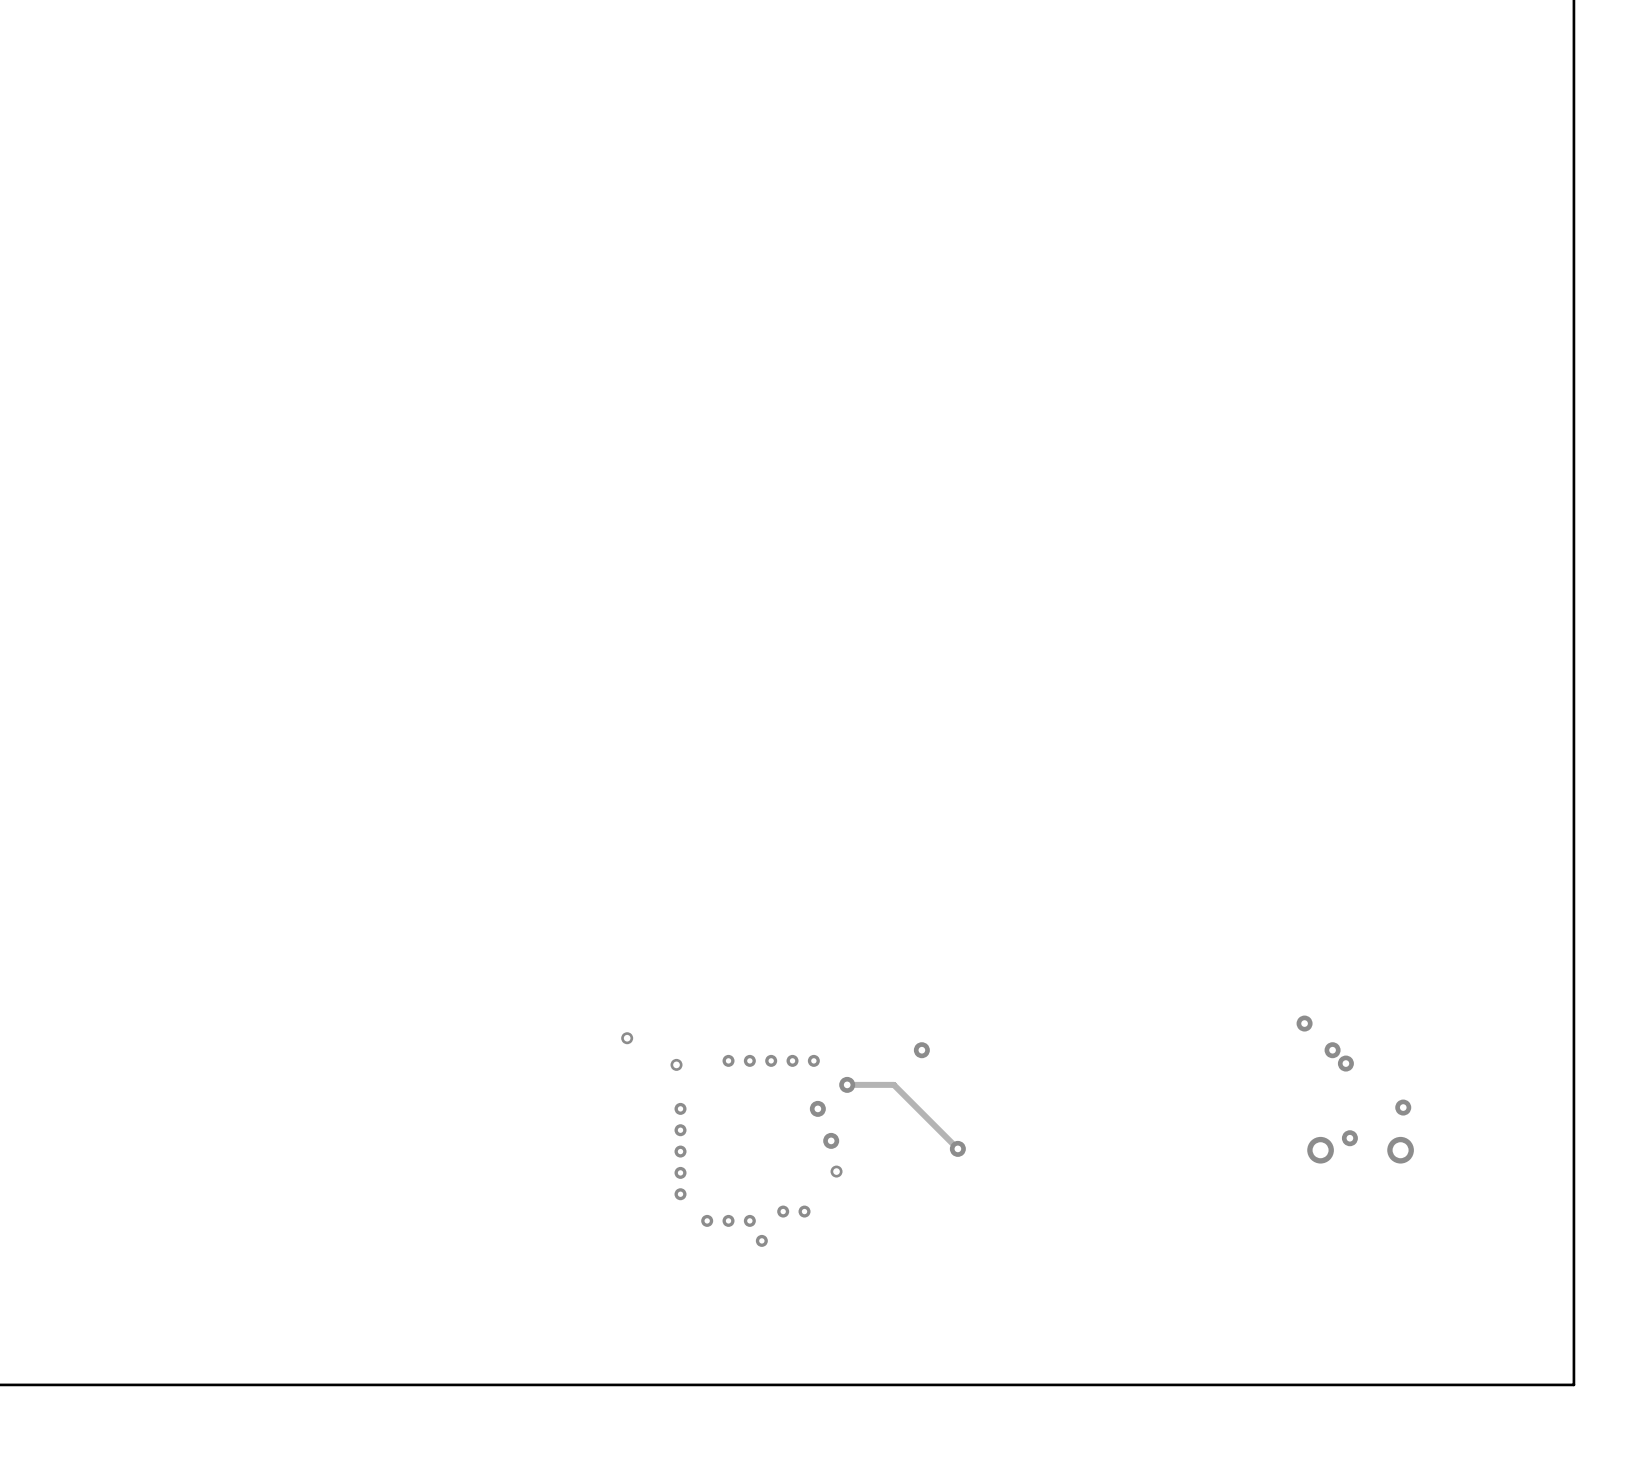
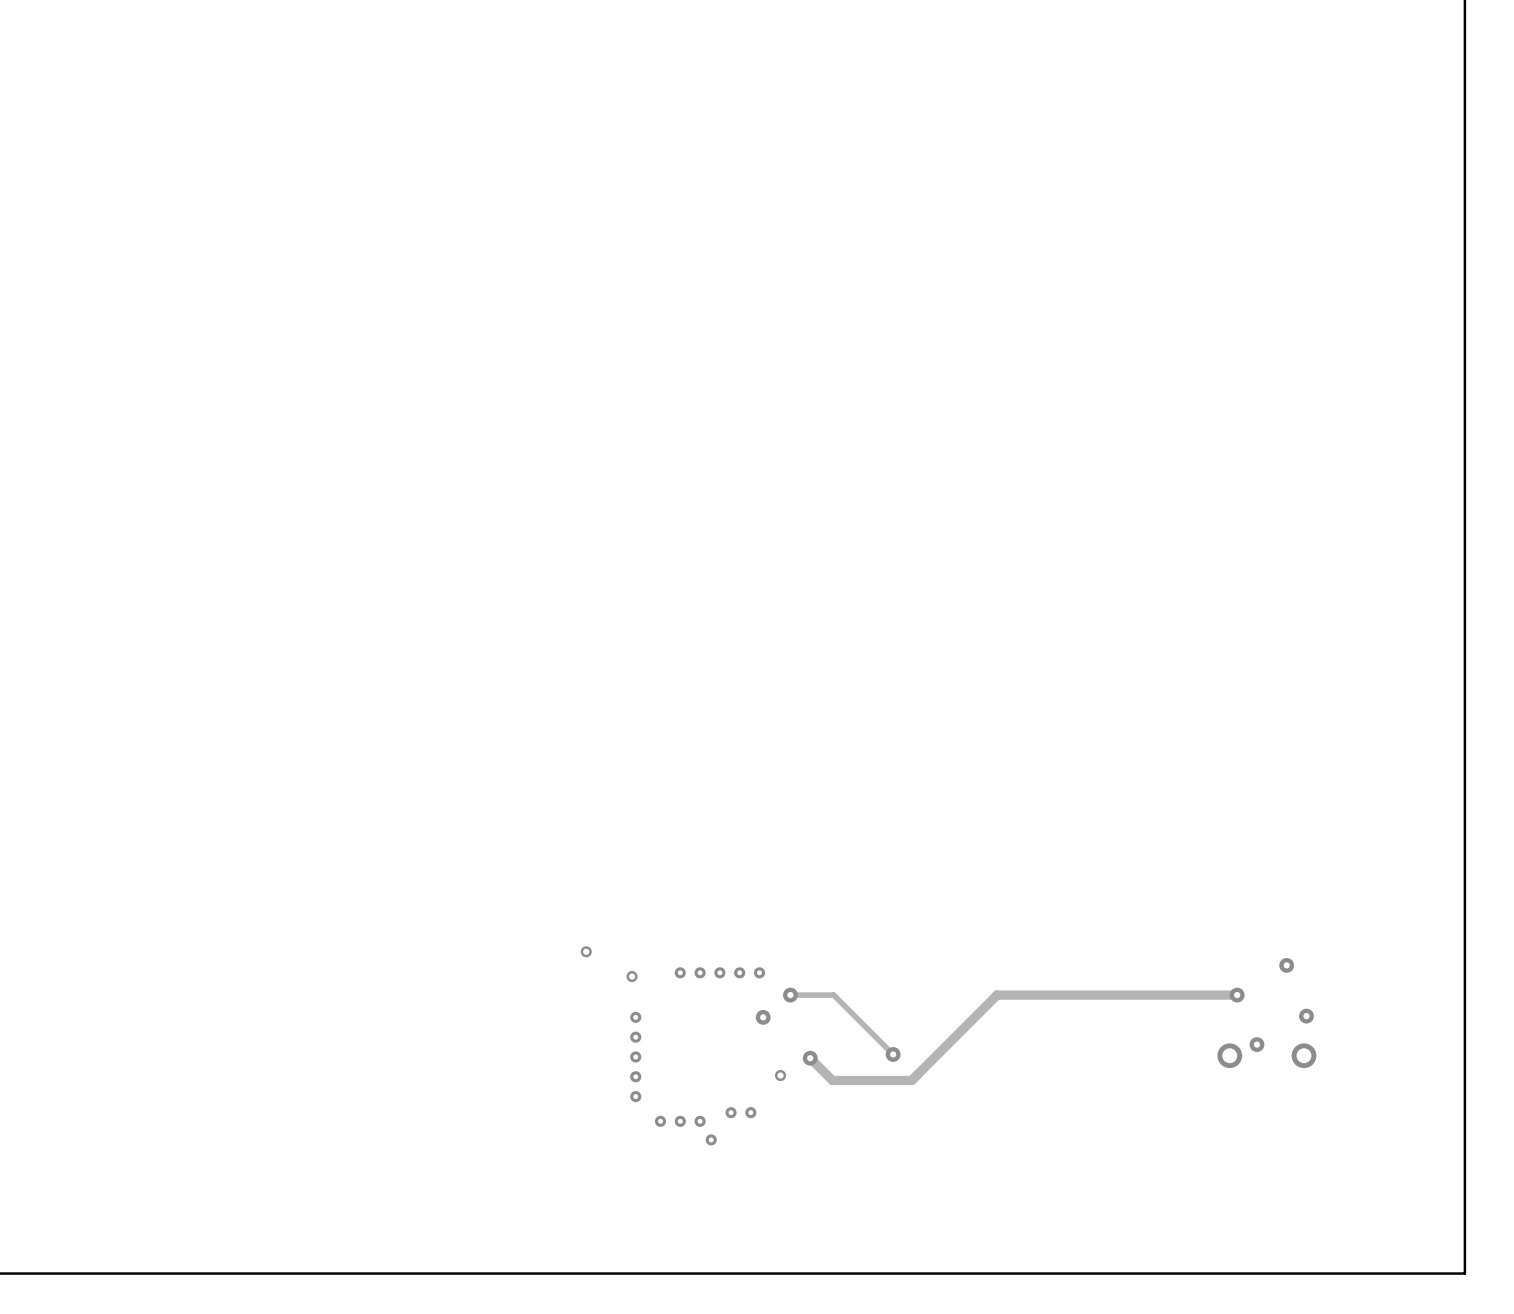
via: (1304, 1023) -> none
via: (921, 1050) -> none
via: (1332, 1050) -> none
via: none -> (1286, 965)
via: (1345, 1063) -> none
track: none -> (1237, 995) (997, 995) (911, 1080) (832, 1080) (810, 1058)
via: none -> (1237, 995)
via position: (831, 1140) -> (810, 1058)

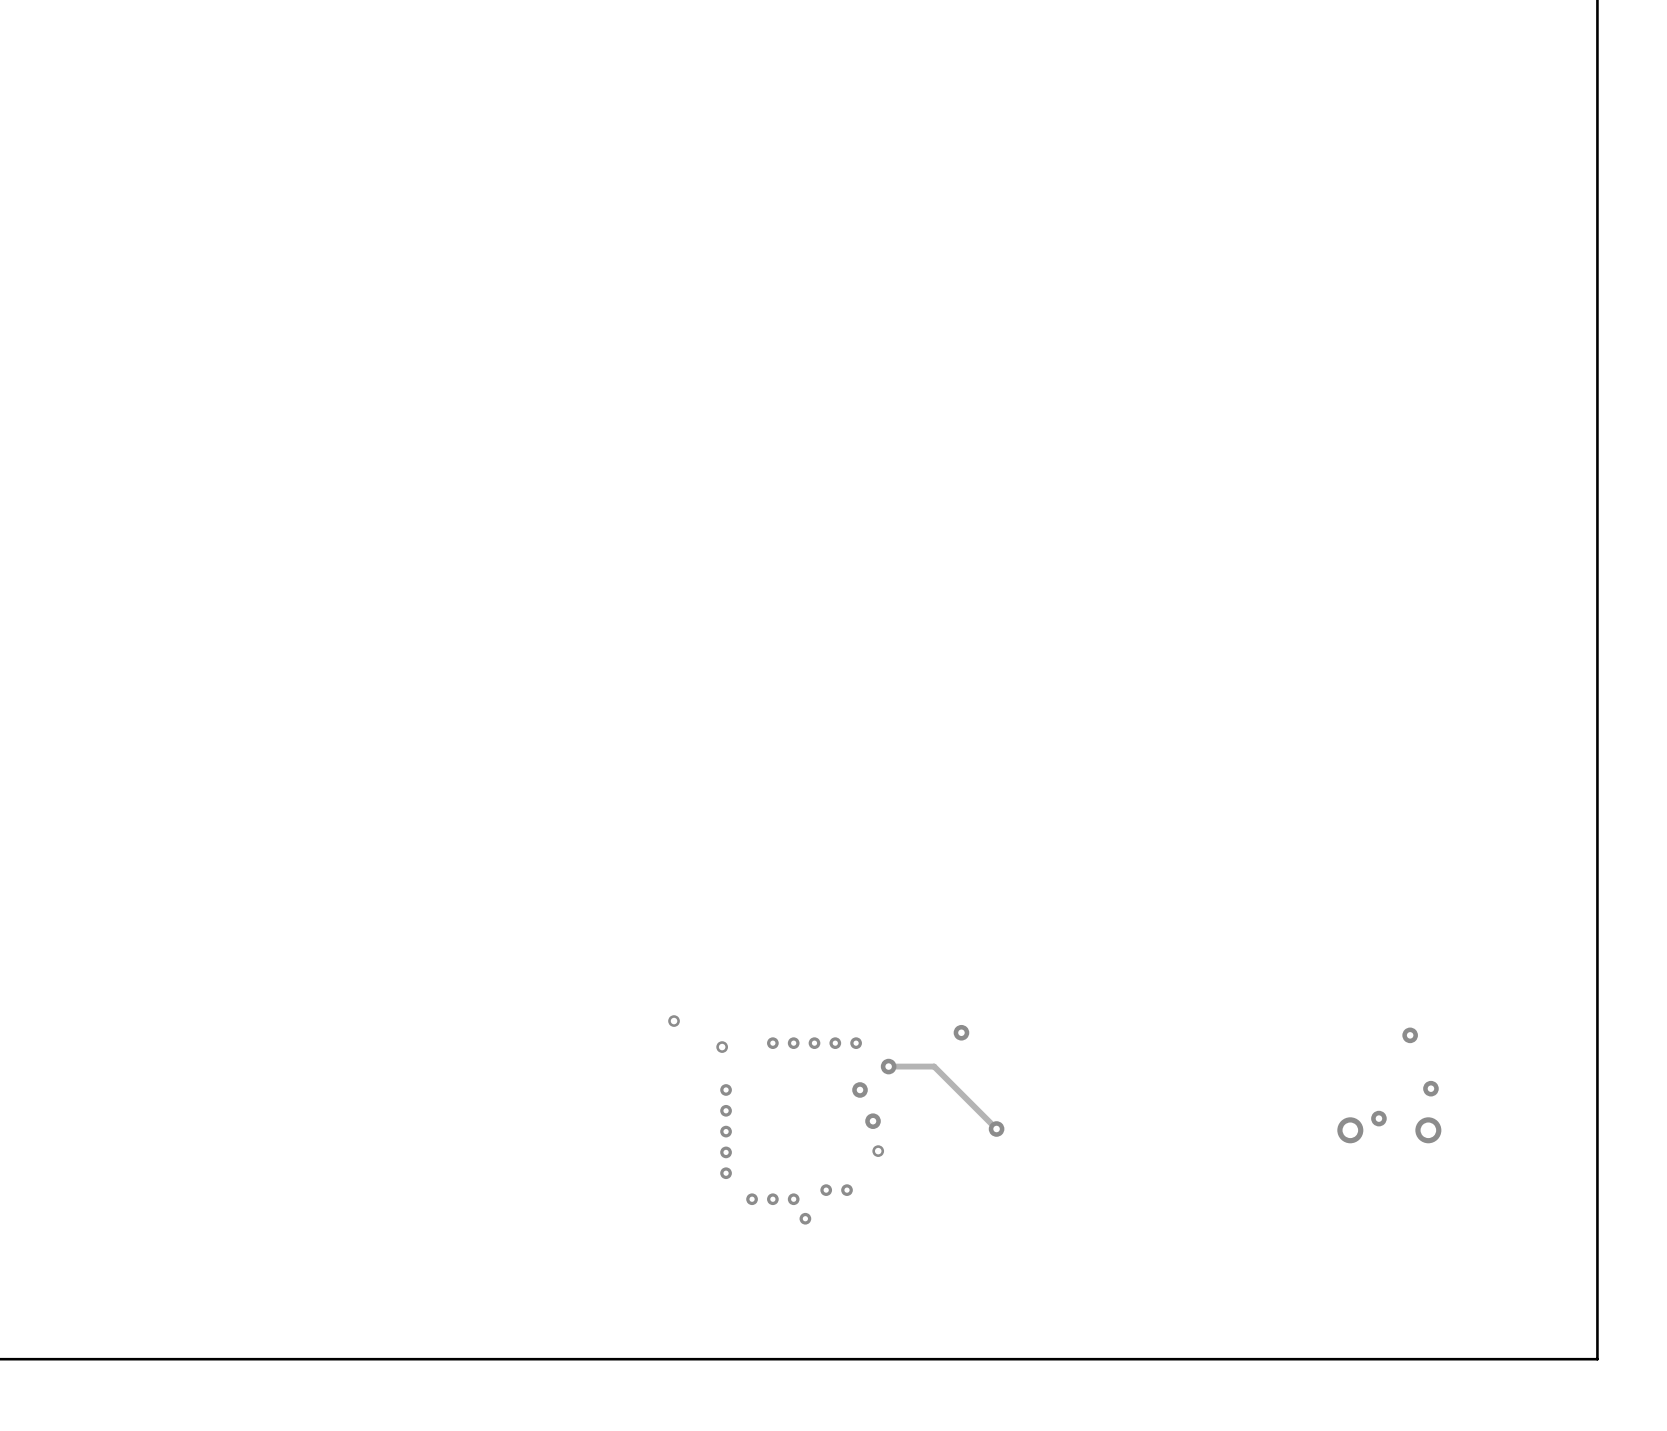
via: none -> (961, 1032)
track: (1237, 995) (997, 995) (911, 1080) (832, 1080) (810, 1058) -> none
via: (1237, 995) -> none
via position: (810, 1058) -> (873, 1121)

